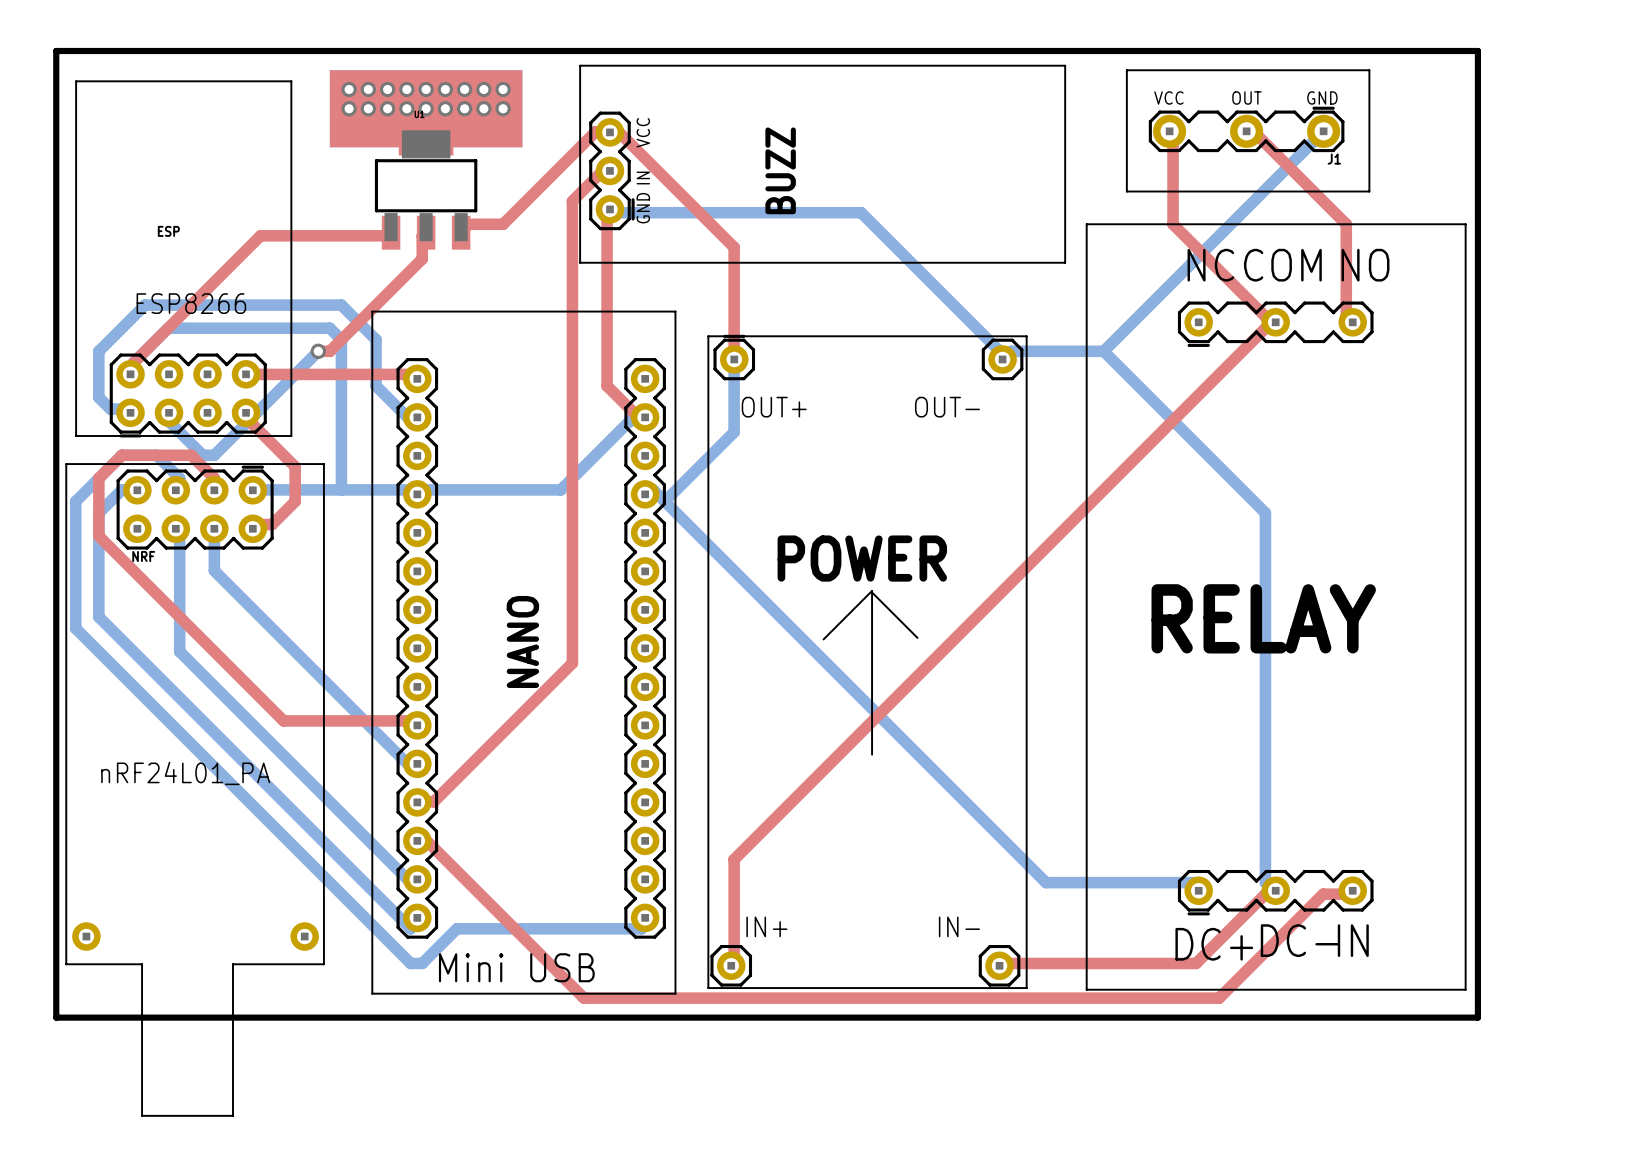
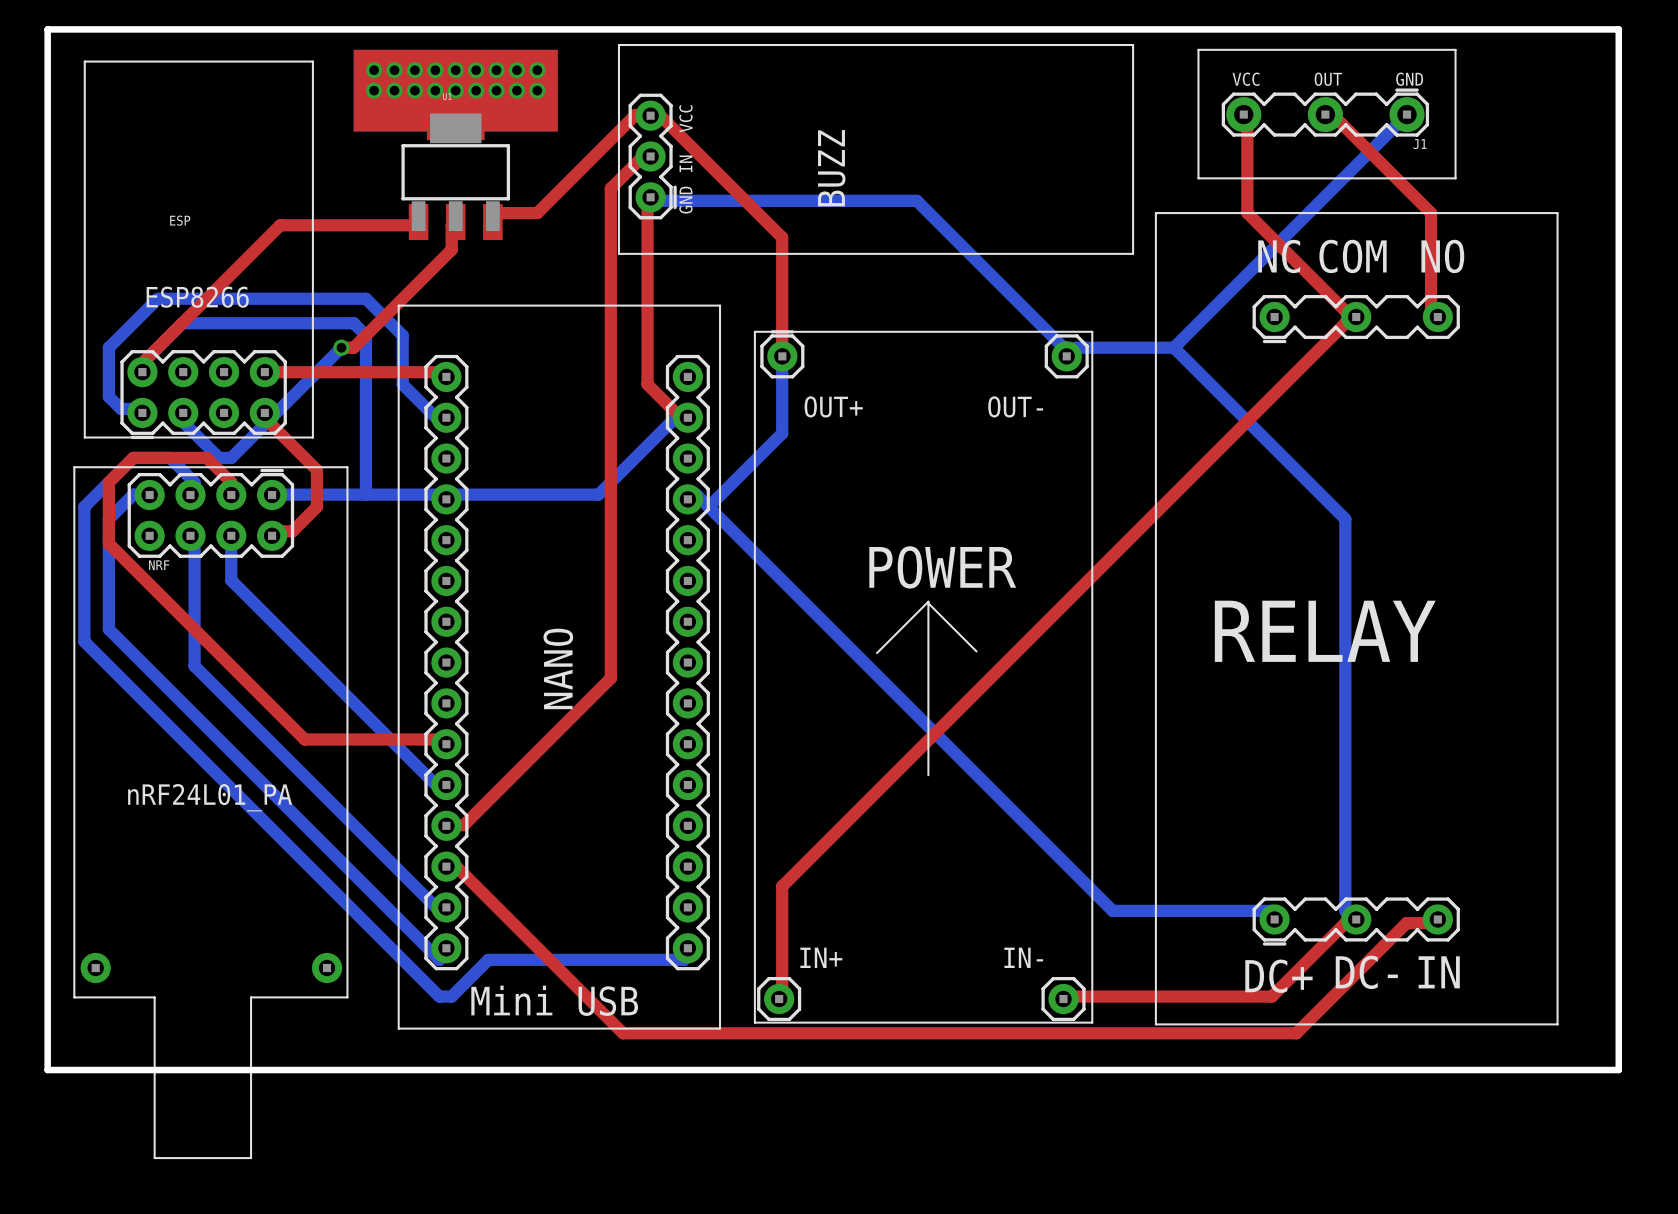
board edge: (56, 51) (56, 1017) (1477, 1017) (1477, 51) -> (63, 29) (47, 29) (47, 1070) (1618, 1070) (1618, 29) (1570, 29)

